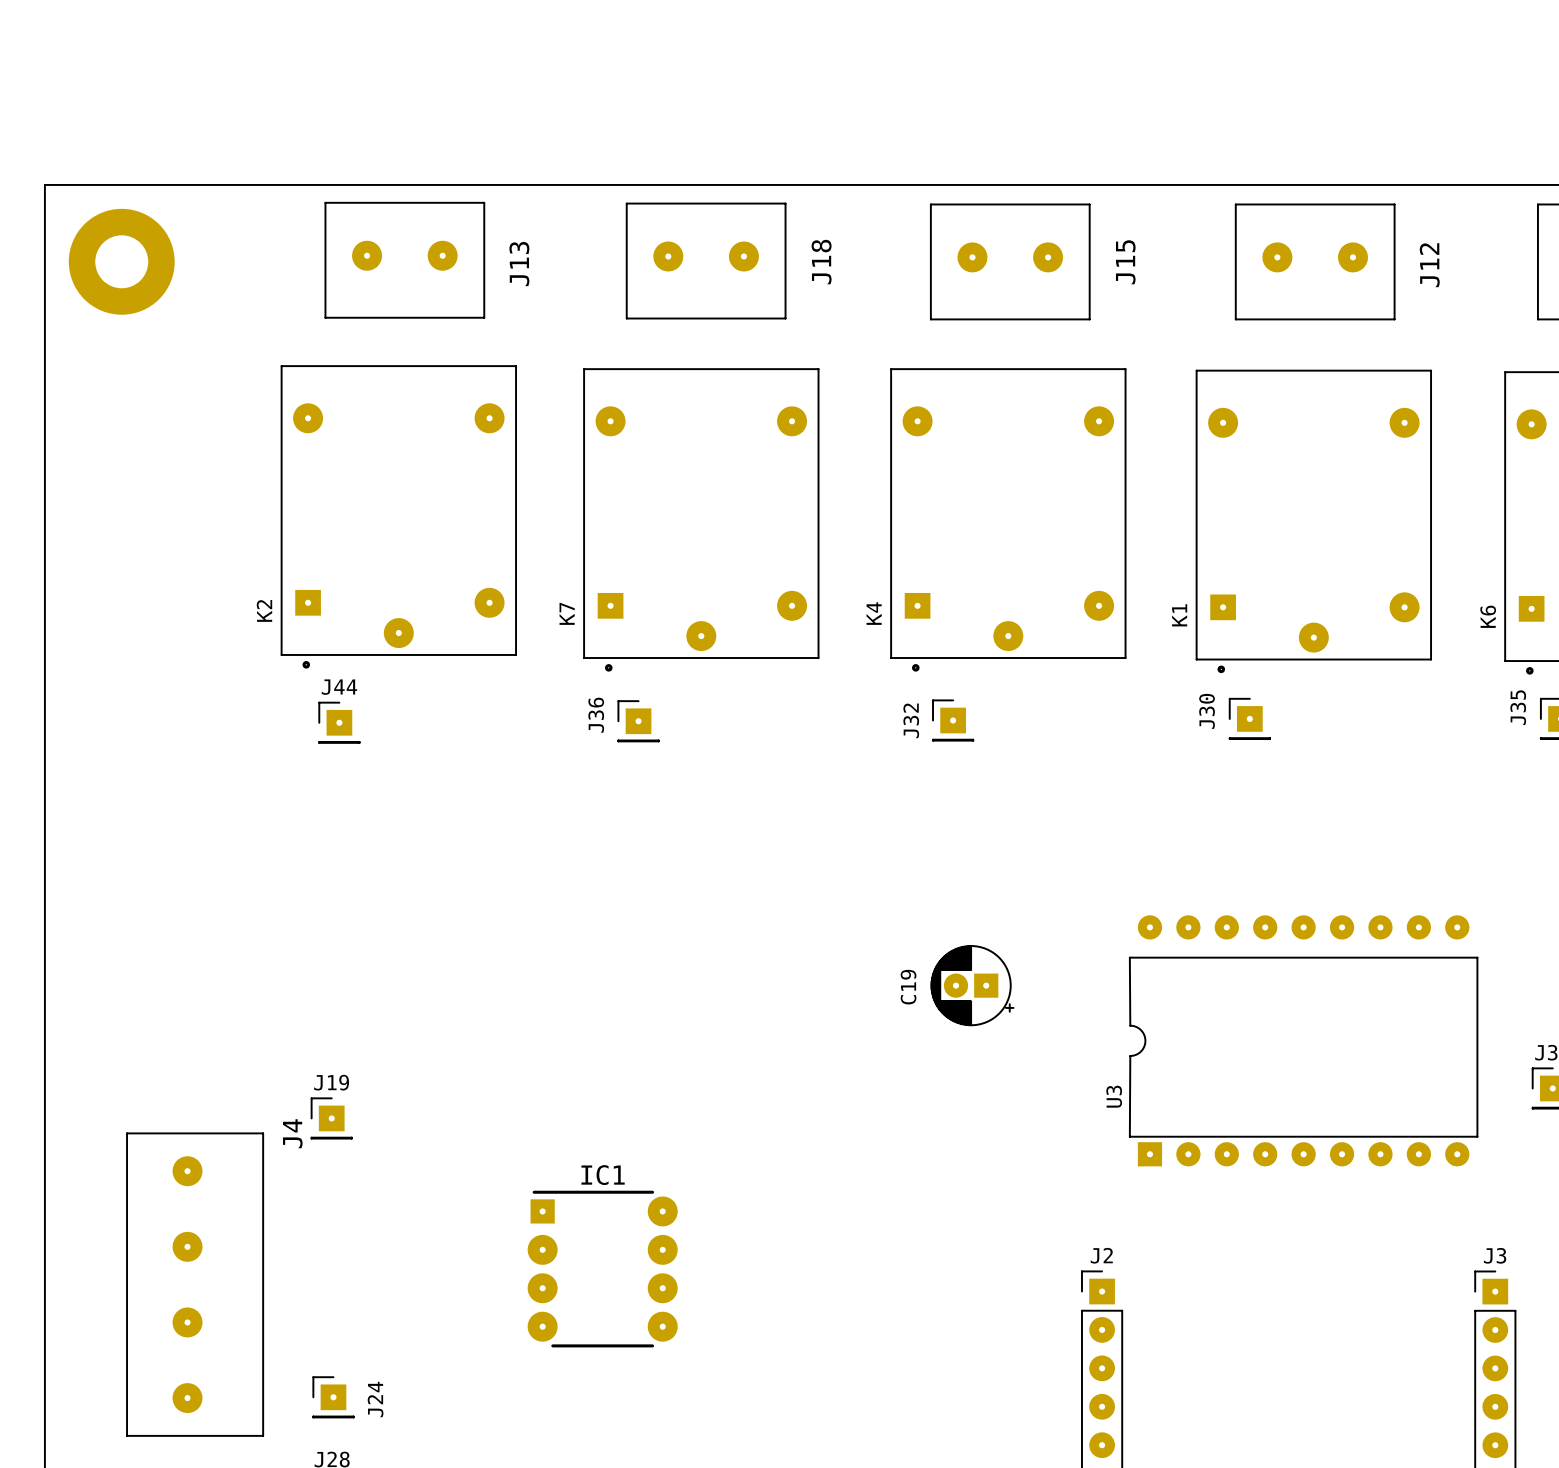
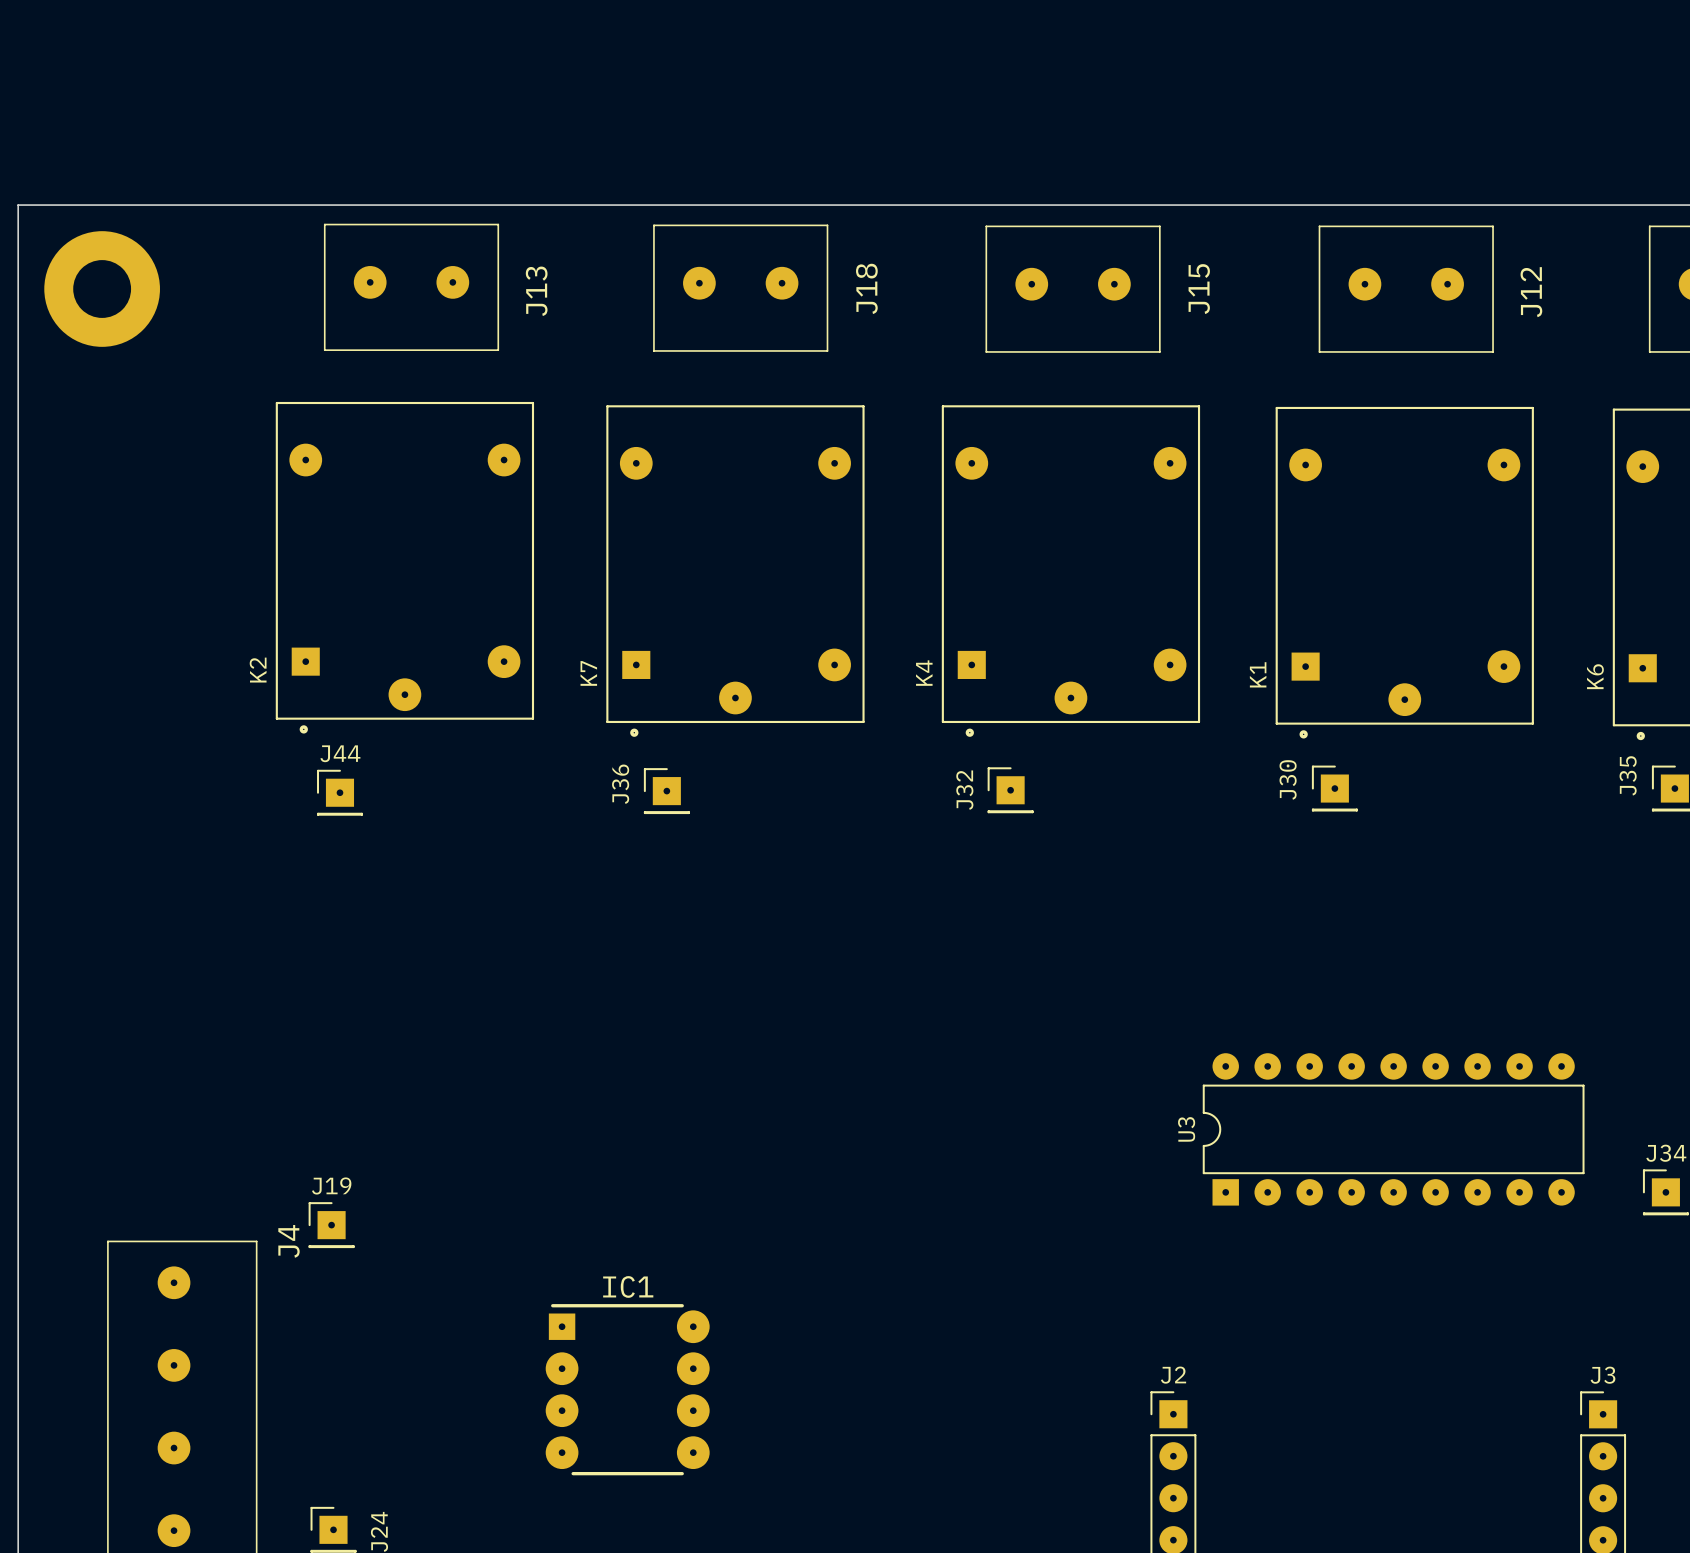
U3 footprint: [1128, 915, 1479, 1167] -> [1202, 1053, 1585, 1206]
C19: (972, 985) -> none
U3 name position: U3 (1114, 1096) -> U3 (1186, 1129)

